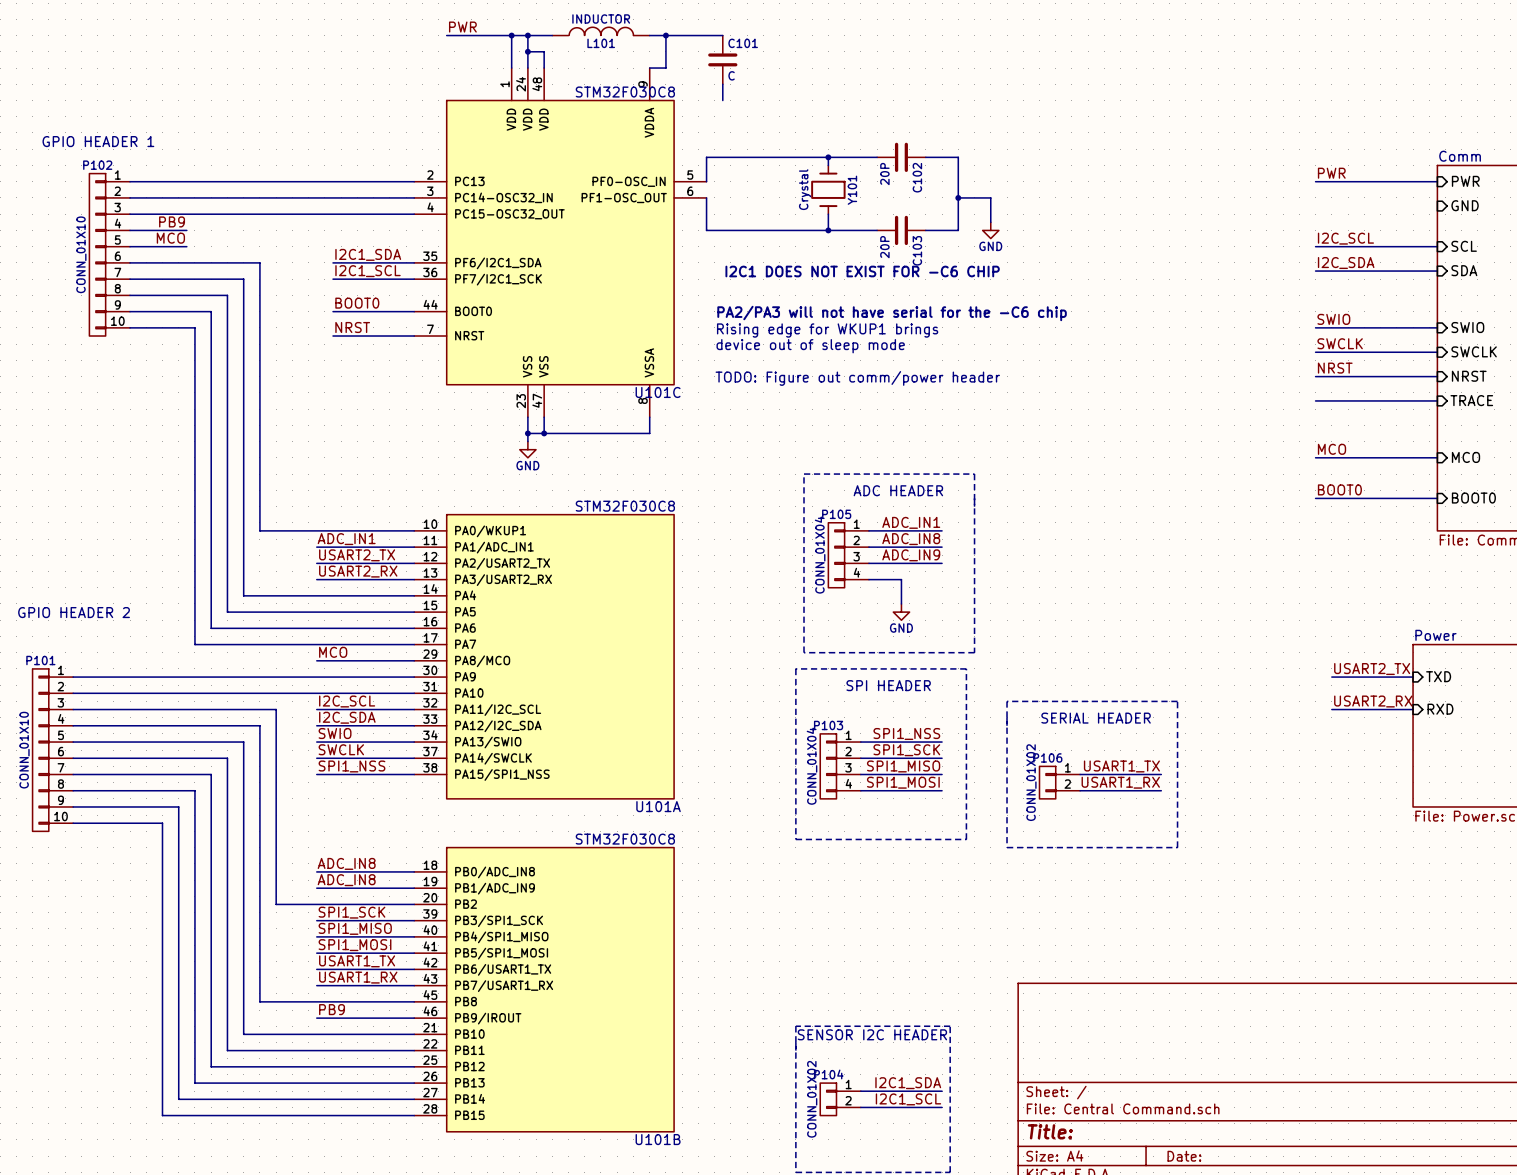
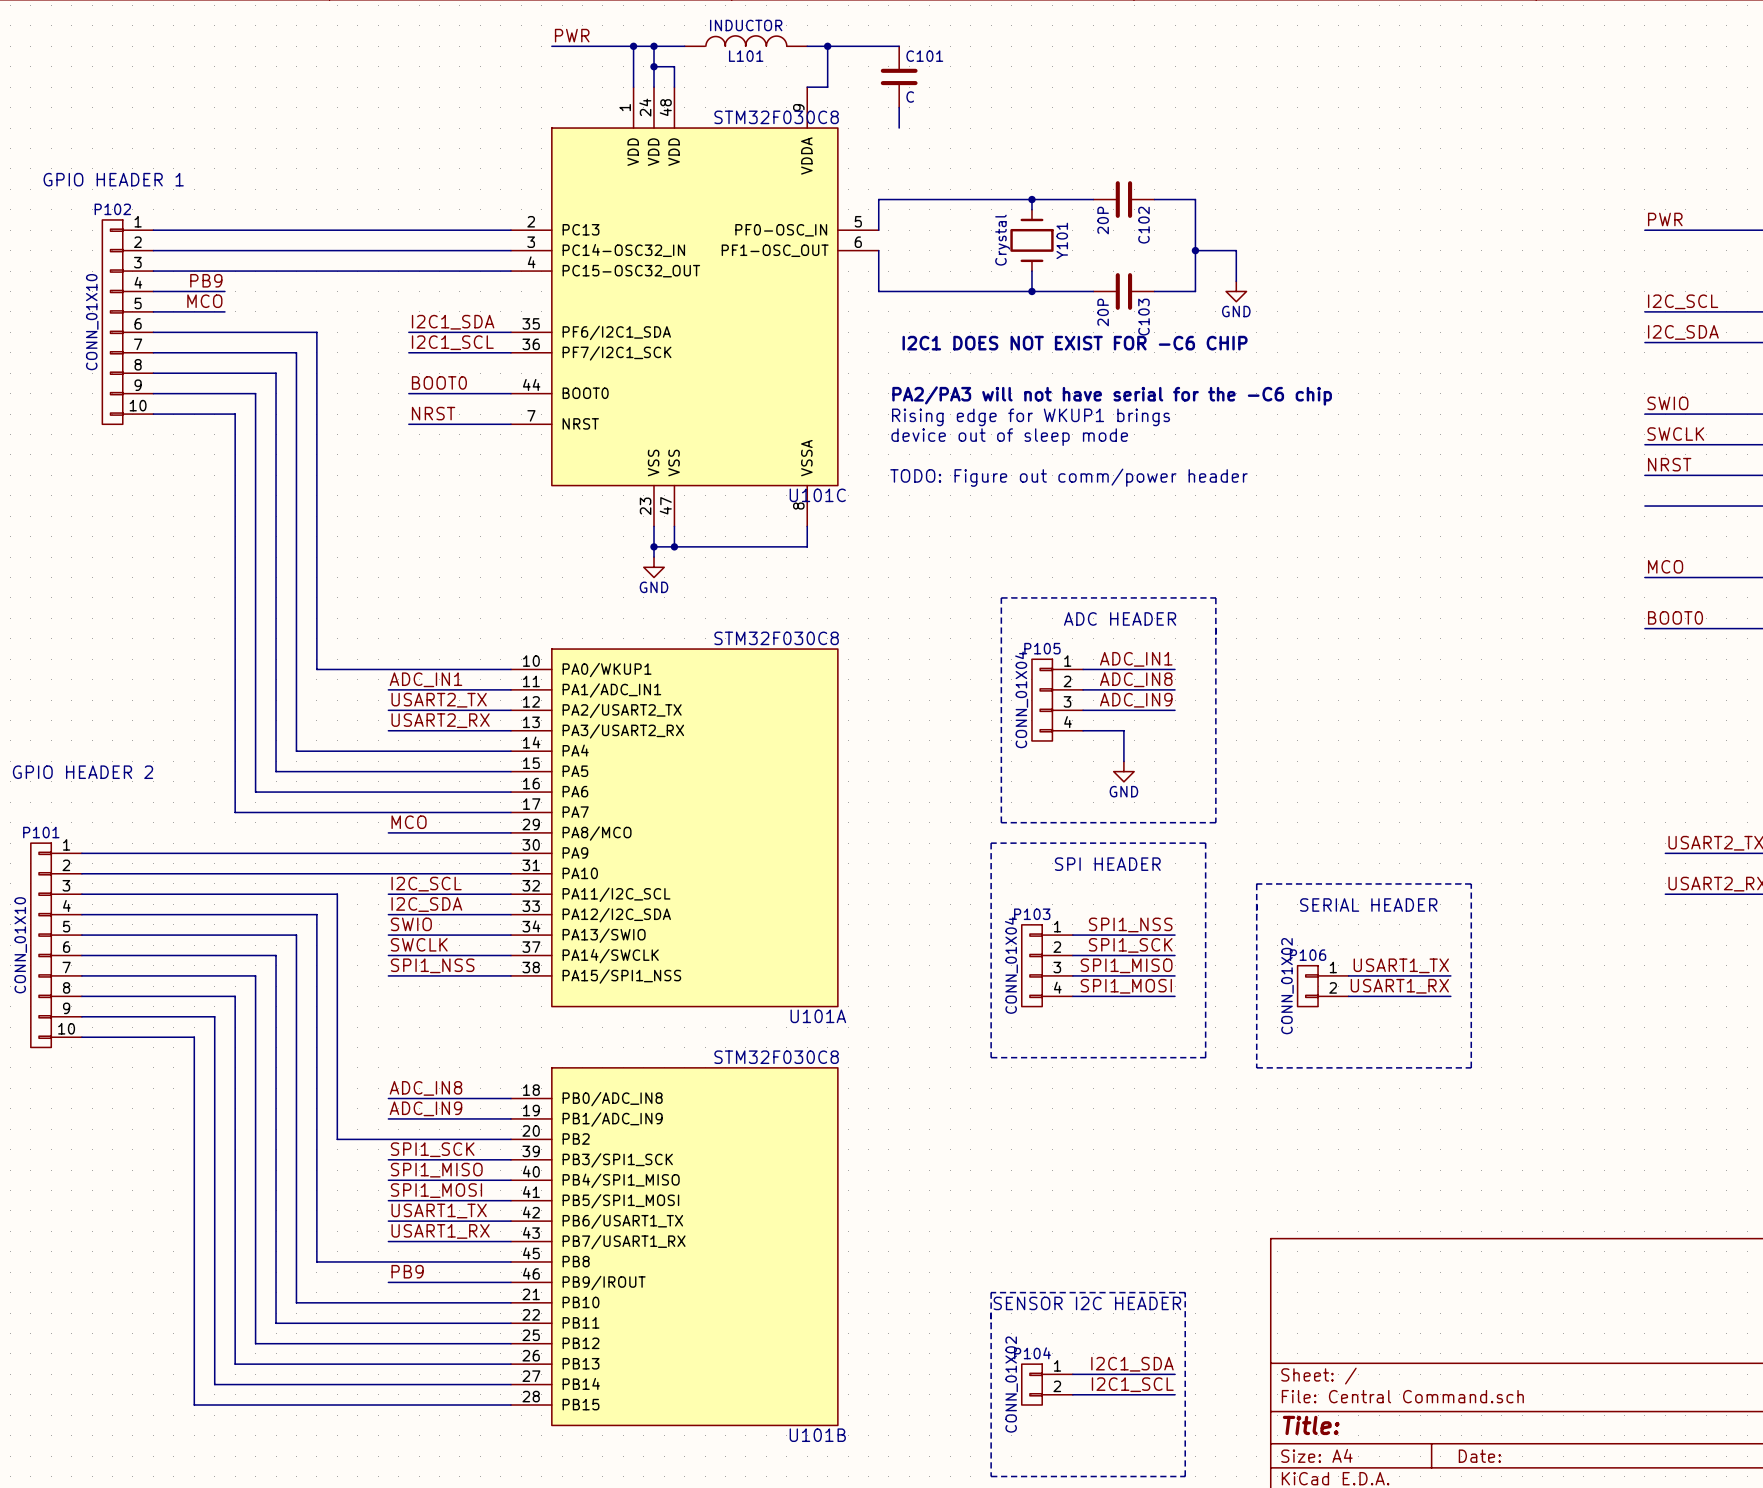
label: ADC_IN8 (346, 880) -> ADC_IN9 (425, 1108)

